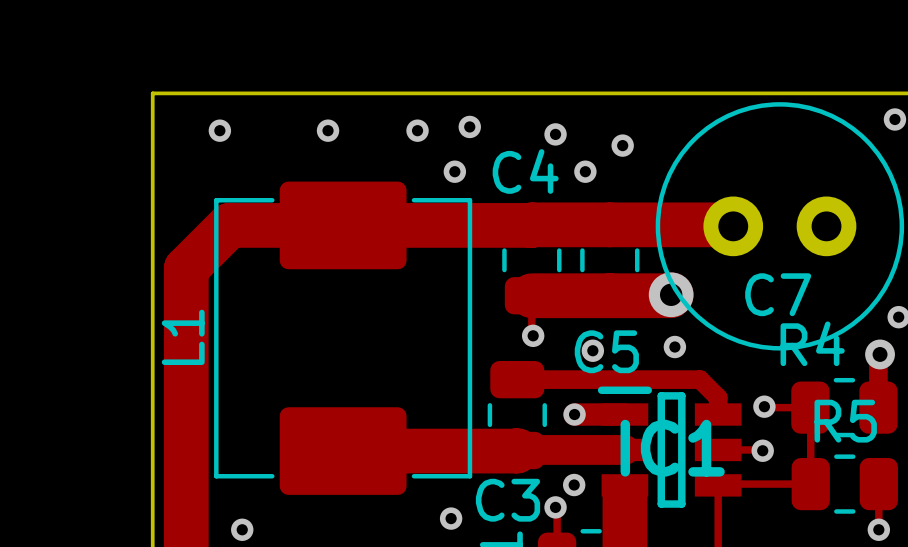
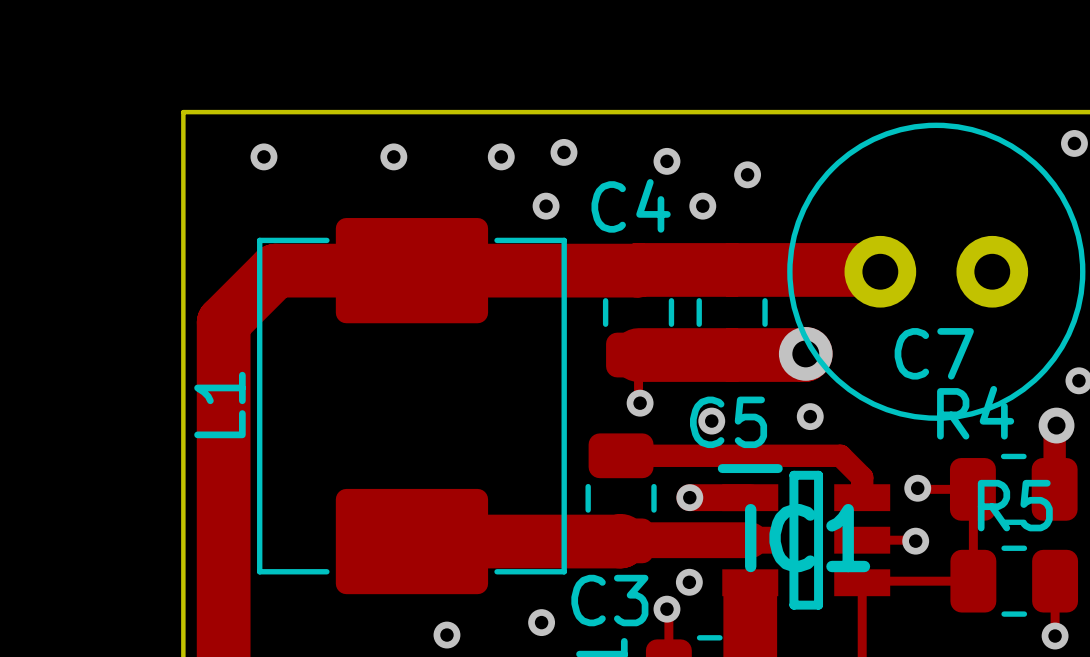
via: none -> (446, 635)
via: (242, 529) -> none

